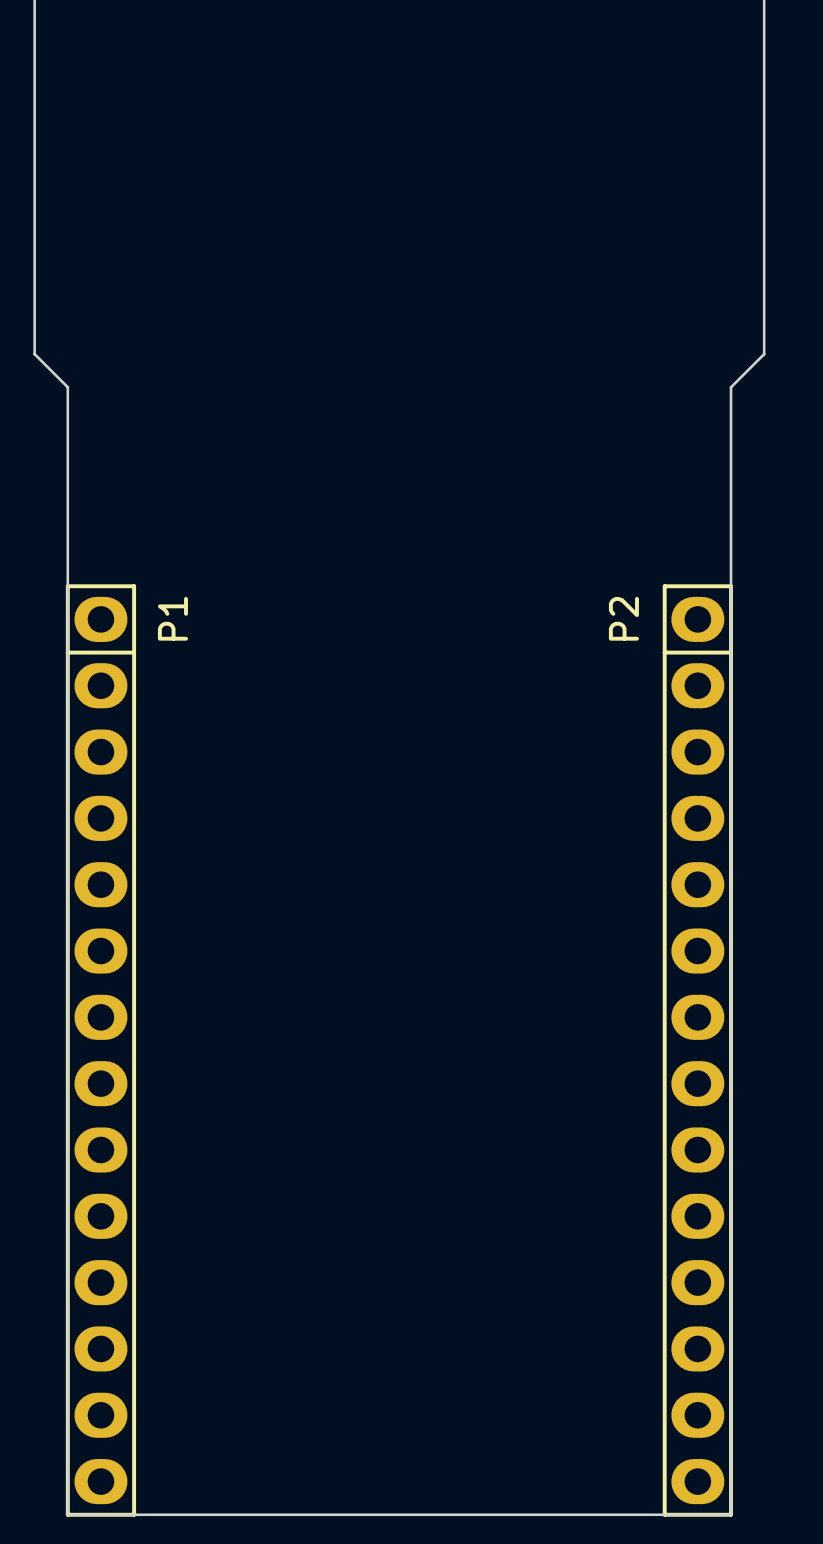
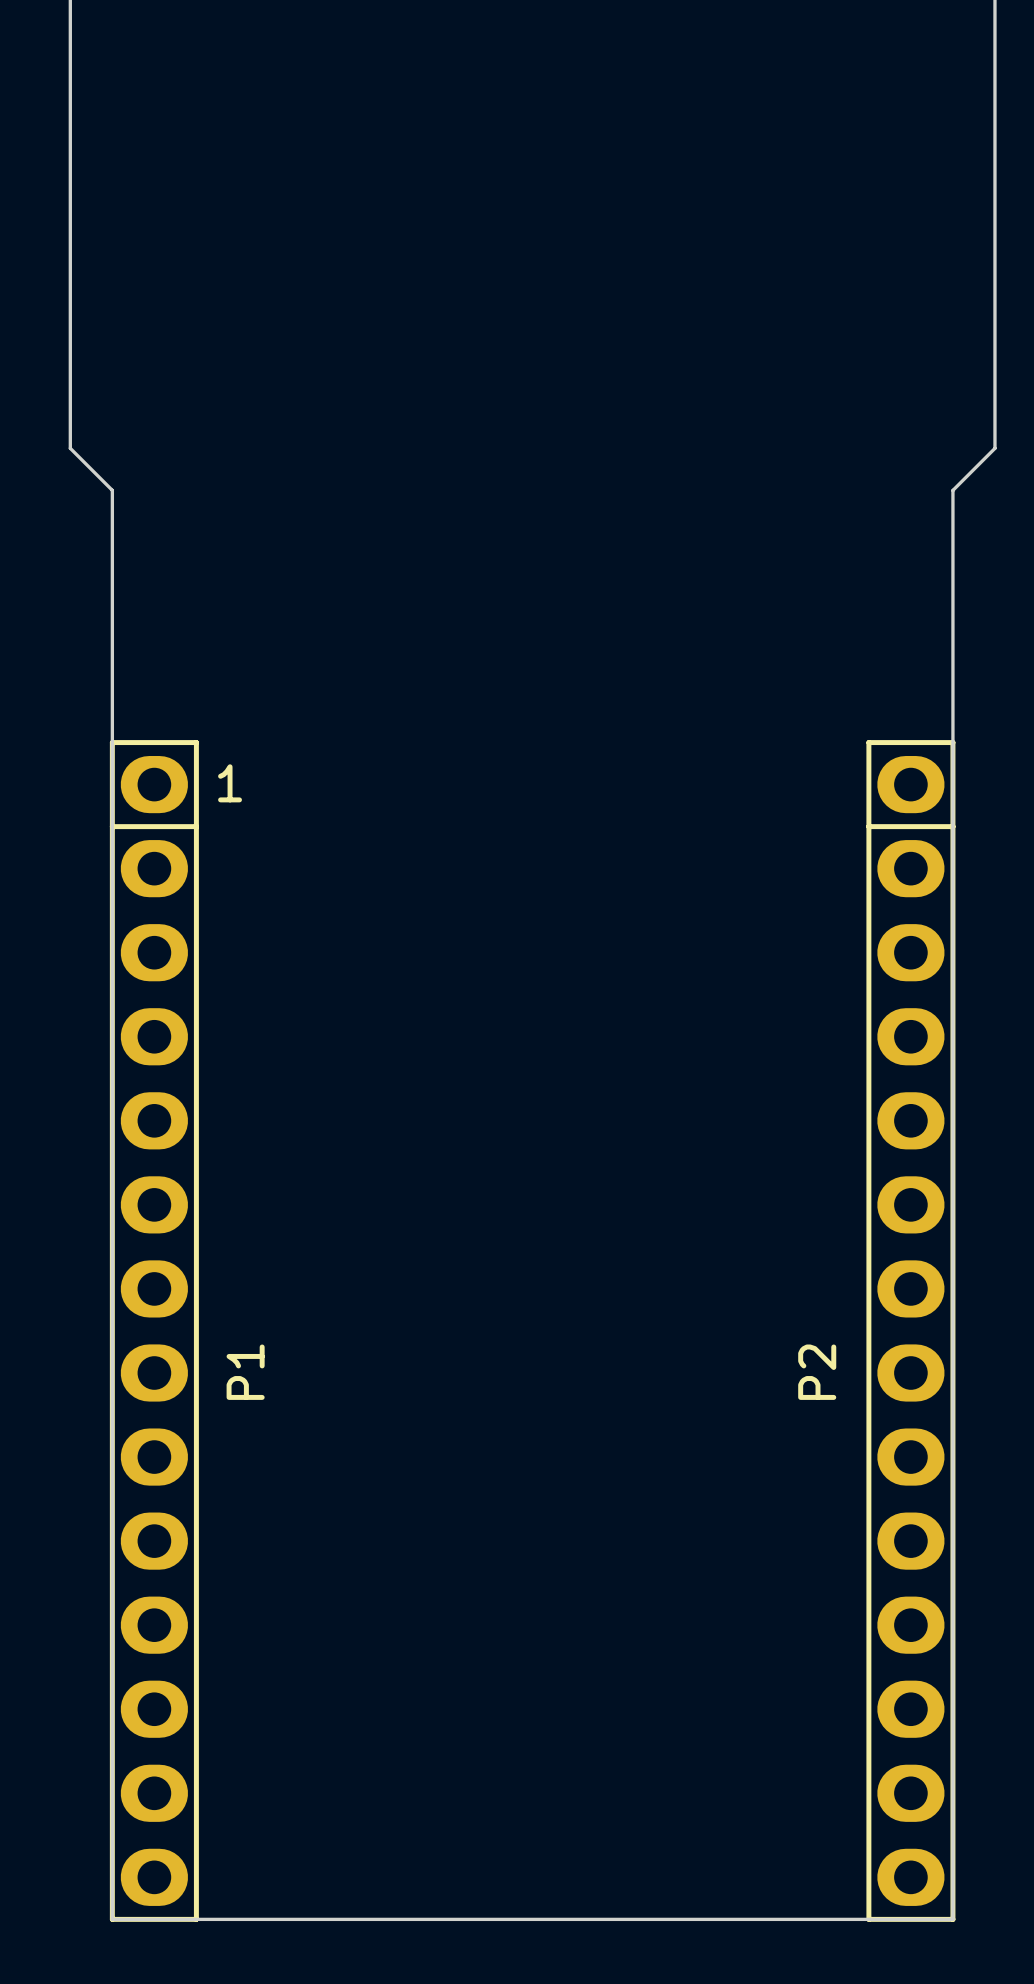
text: none -> 1 (230, 783)
P1 name position: P1 (172, 618) -> P1 (245, 1372)
P2 name position: P2 (623, 618) -> P2 (817, 1372)

